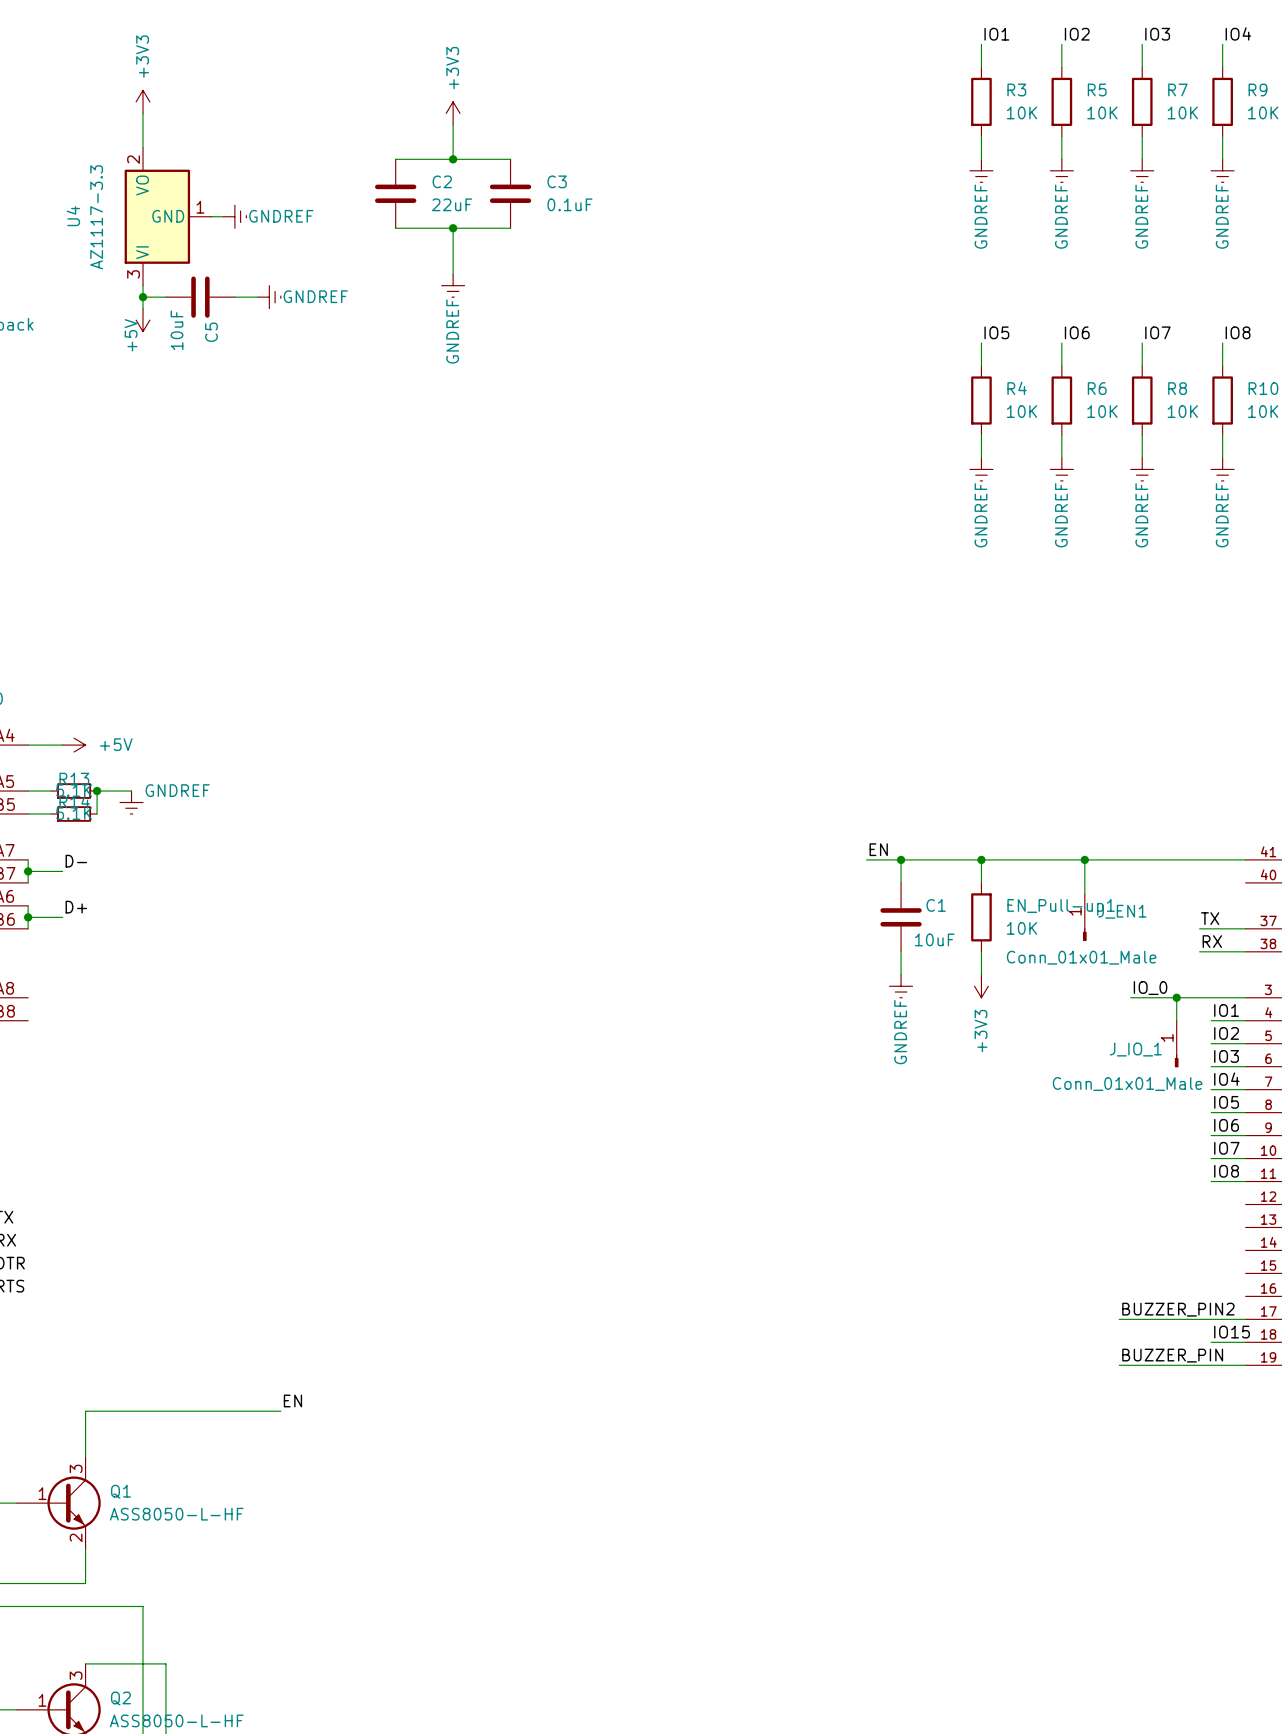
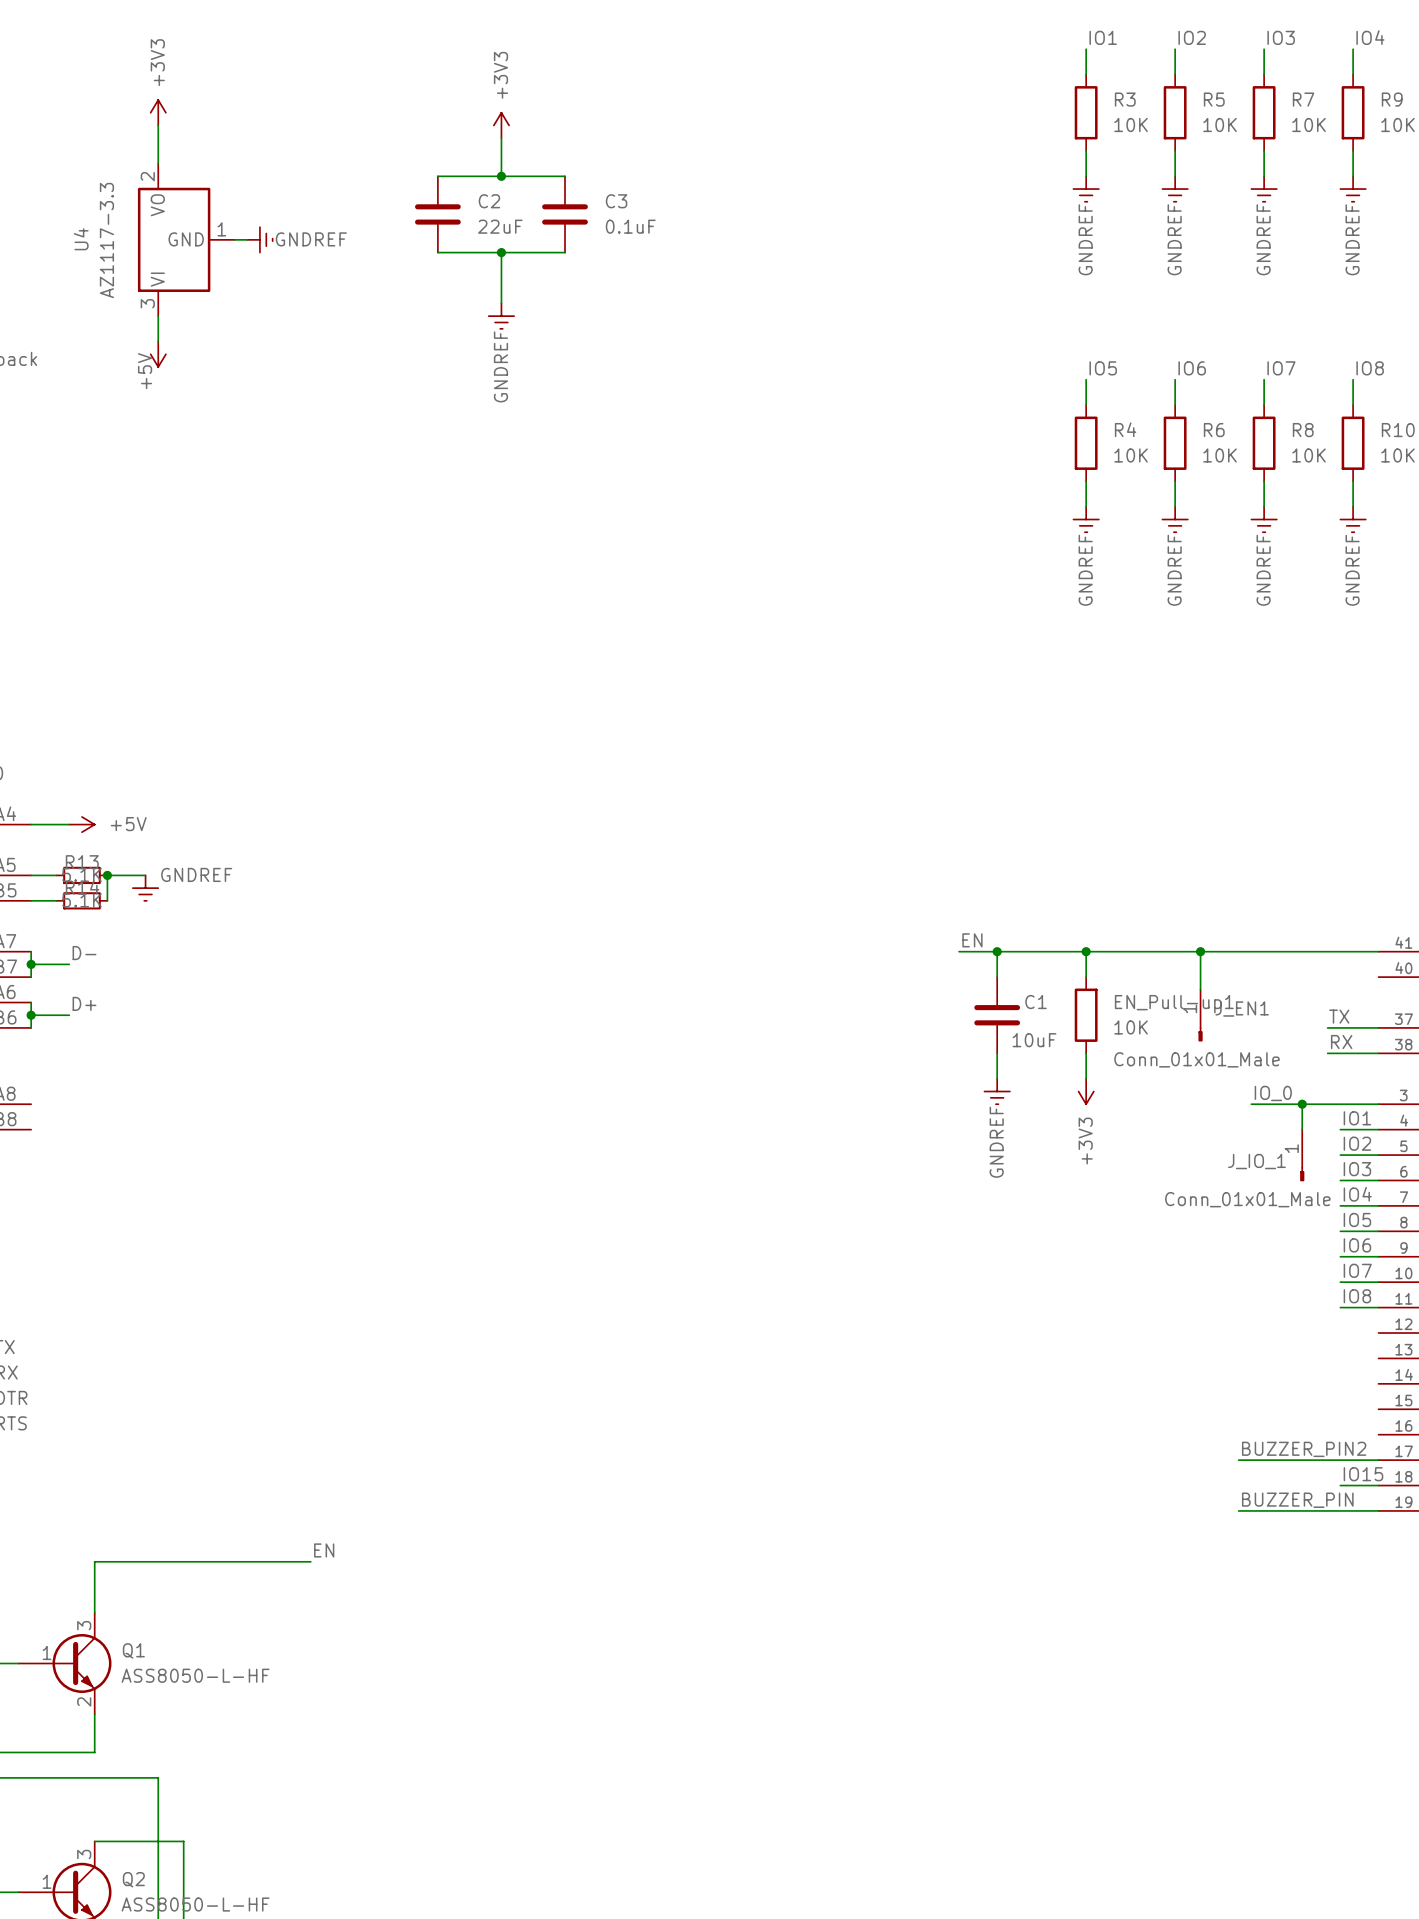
wire: (143, 297) (165, 297) -> none
junction: (143, 297) -> none
C5: 10uF (200, 297) -> none
wire: (234, 297) (257, 297) -> none
power symbol: GNDREF (269, 297) -> none

